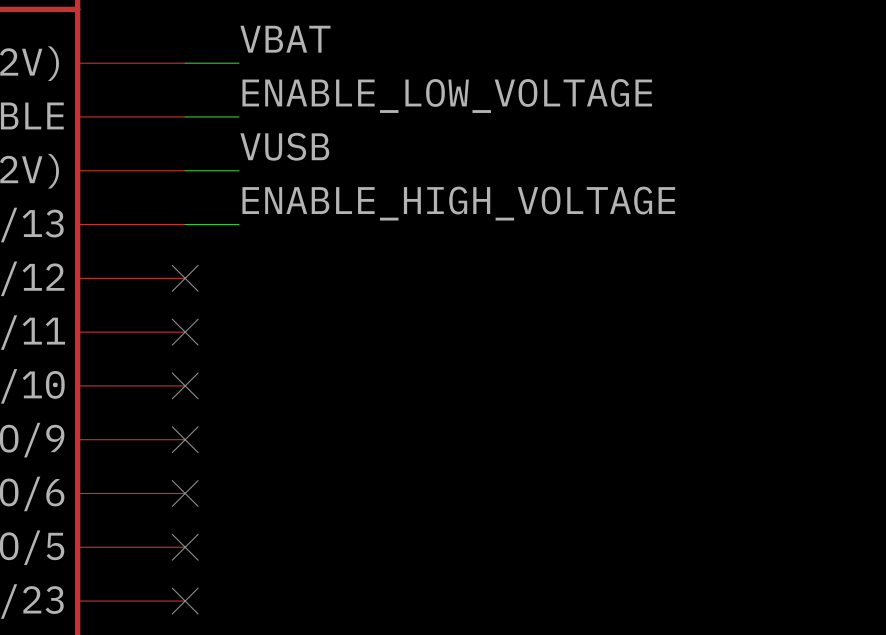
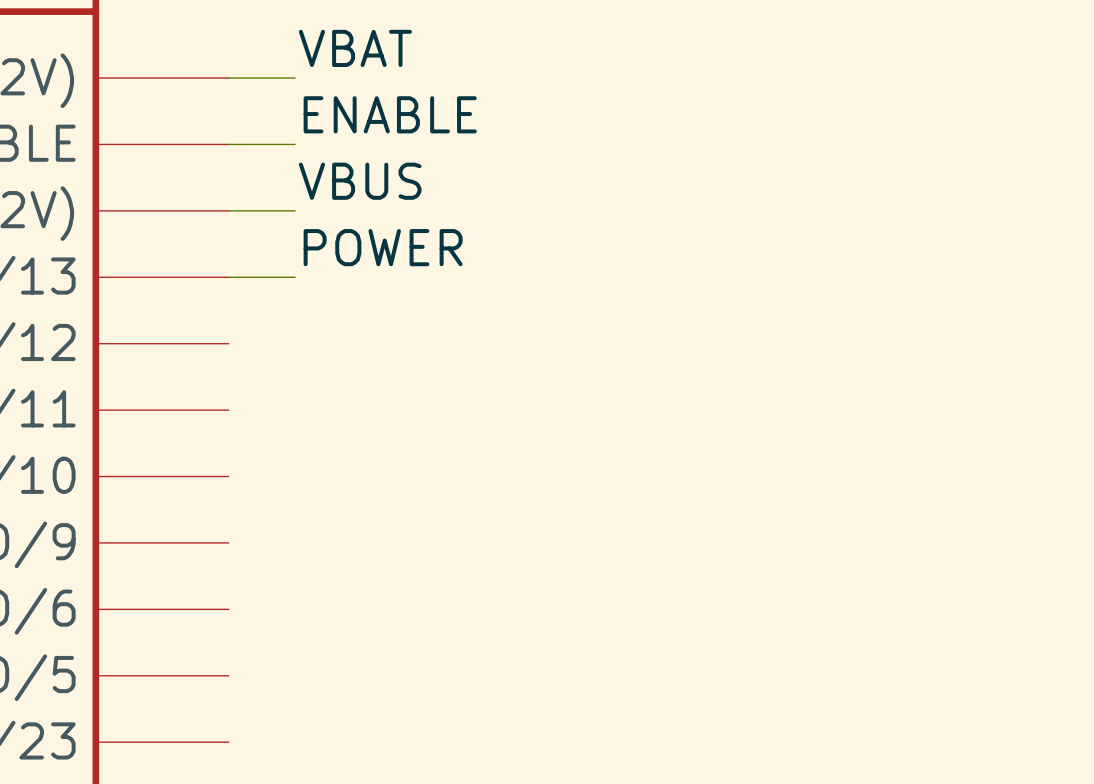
label: ENABLE_LOW_VOLTAGE (447, 96) -> ENABLE (390, 114)
label: VUSB (284, 146) -> VBUS (360, 181)
label: ENABLE_HIGH_VOLTAGE (458, 203) -> POWER (383, 247)
no-connect mark: (185, 278) -> none
no-connect mark: (185, 332) -> none
no-connect mark: (185, 385) -> none
no-connect mark: (185, 439) -> none
no-connect mark: (185, 493) -> none
no-connect mark: (185, 547) -> none
no-connect mark: (185, 601) -> none

